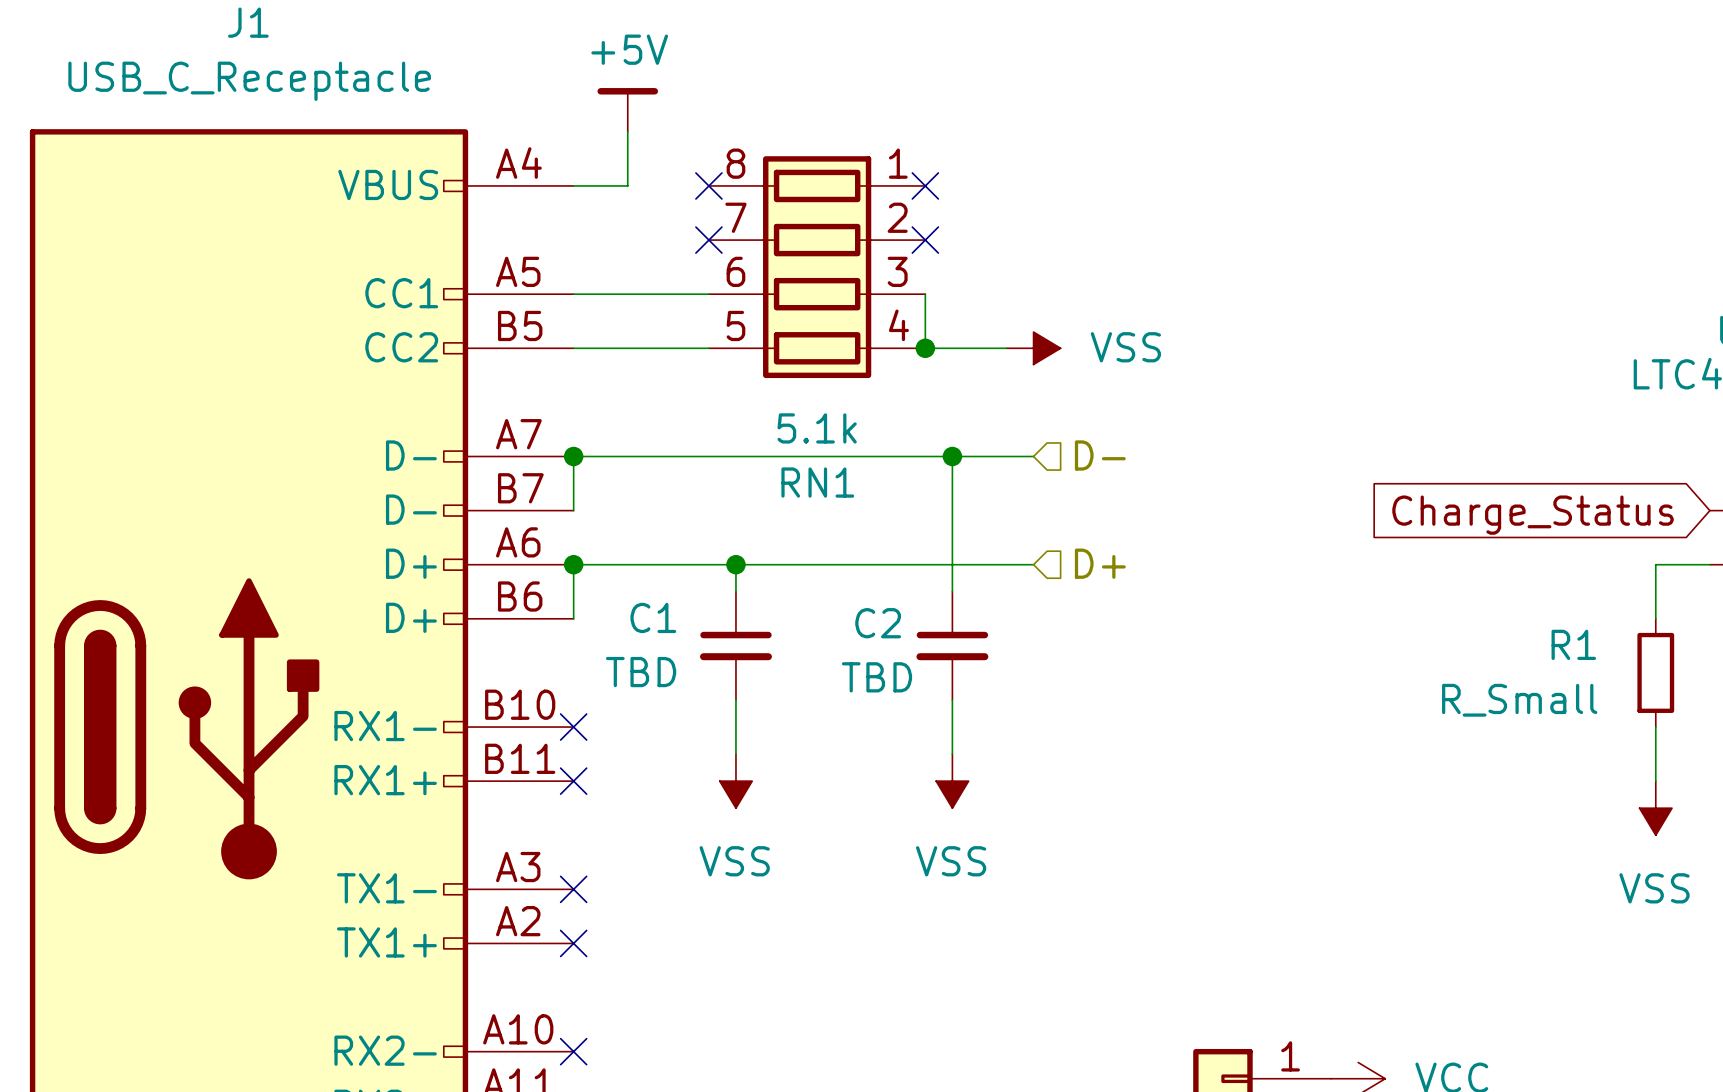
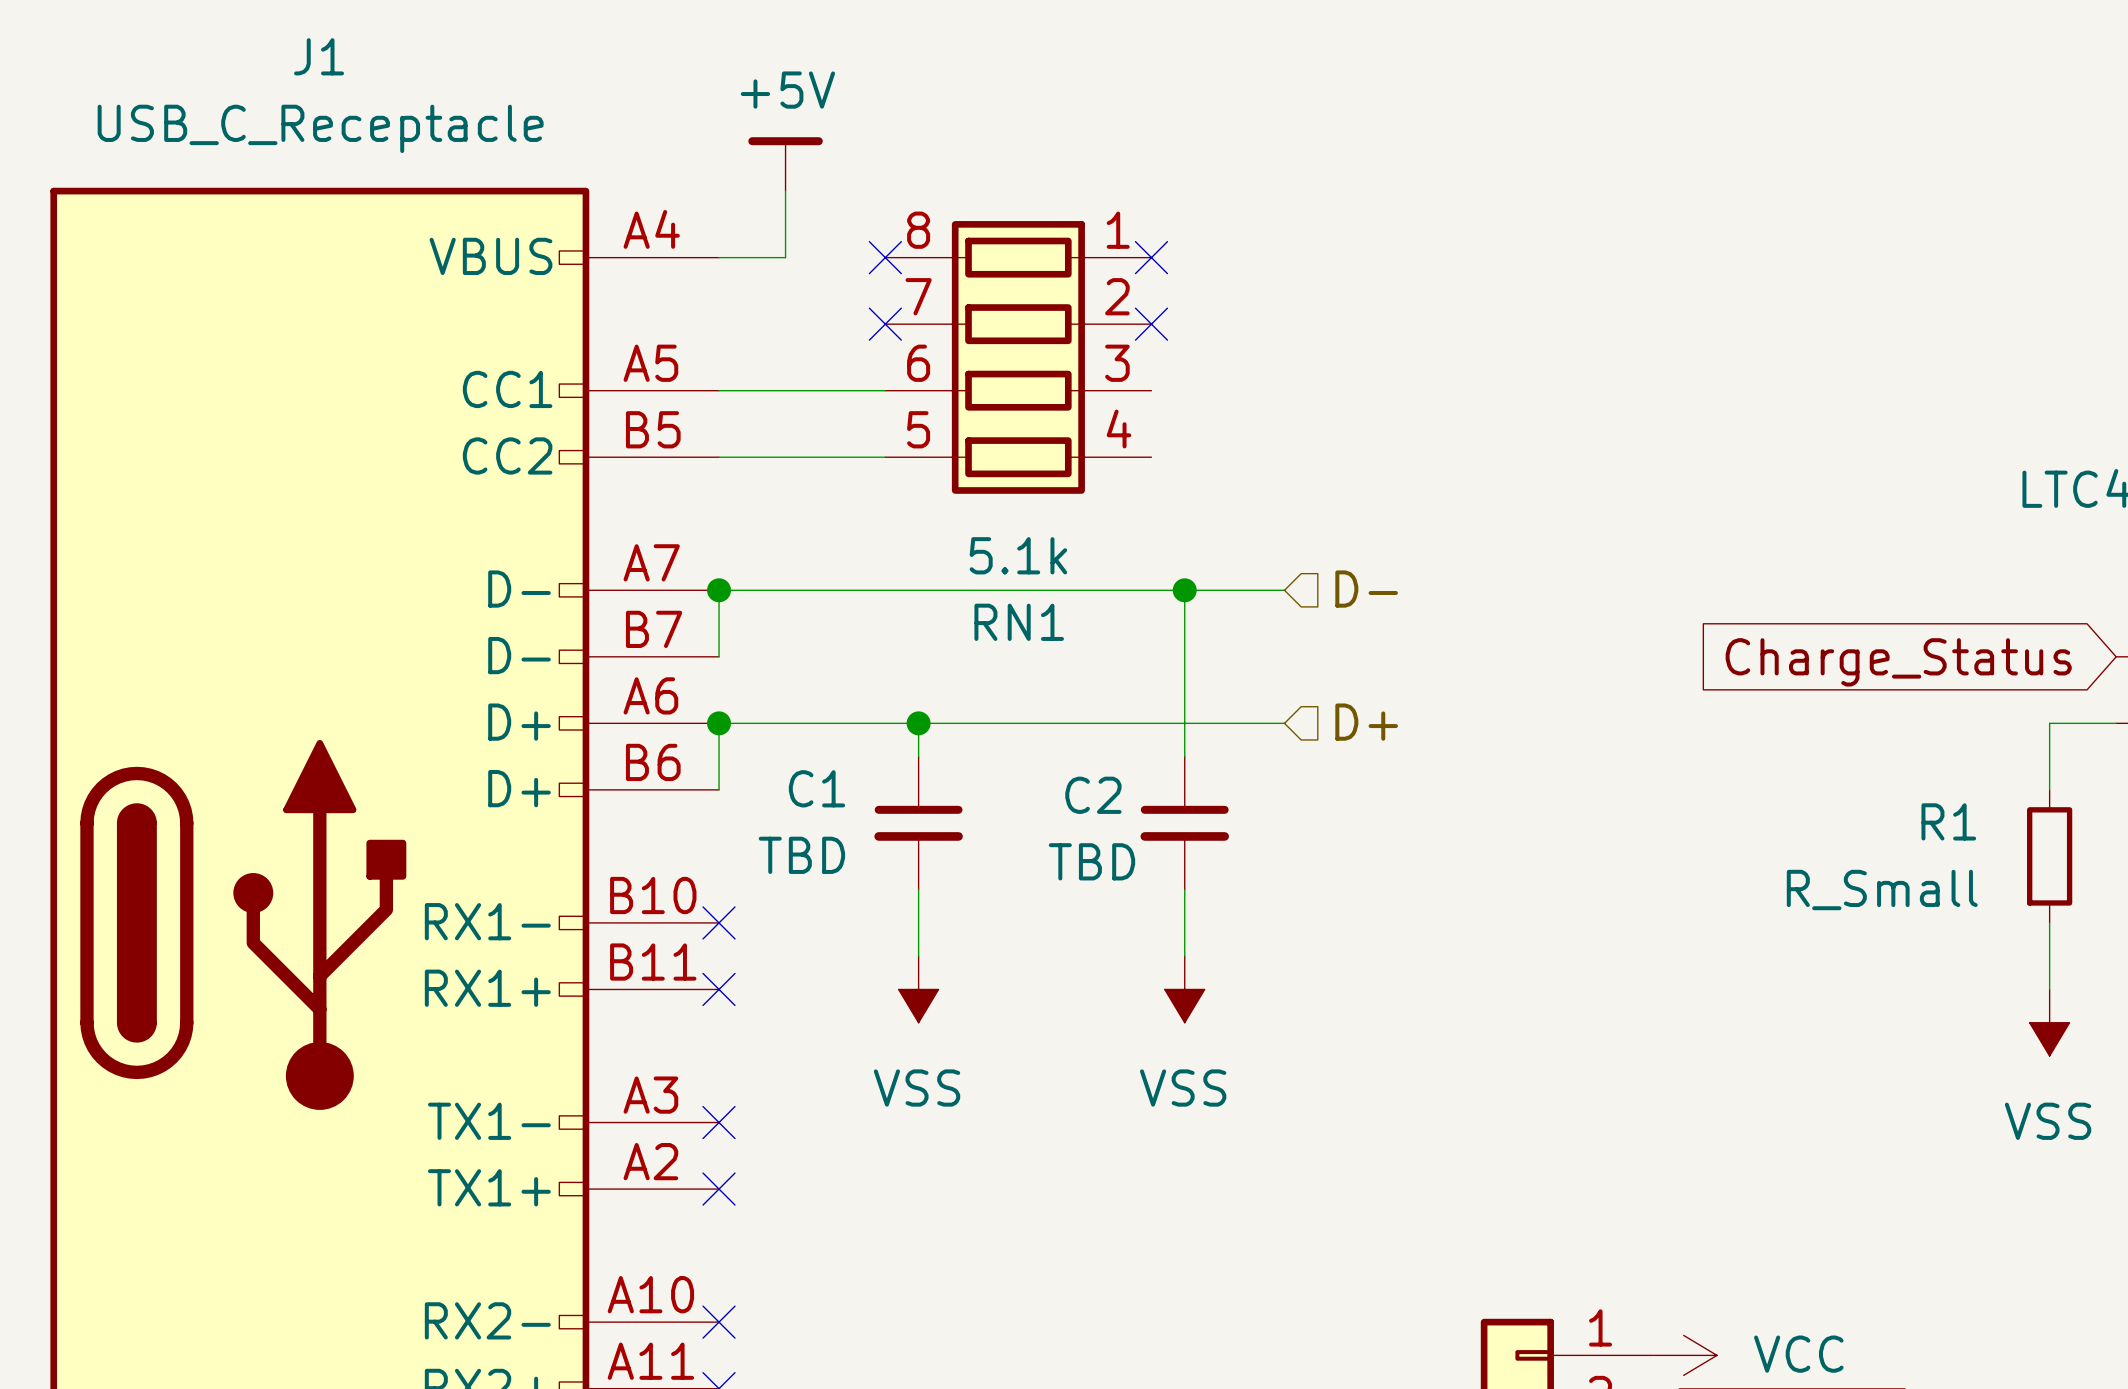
wire: (925, 294) (925, 348) (1006, 348) -> none
junction: (925, 348) -> none
power symbol: VSS (1033, 348) -> none

